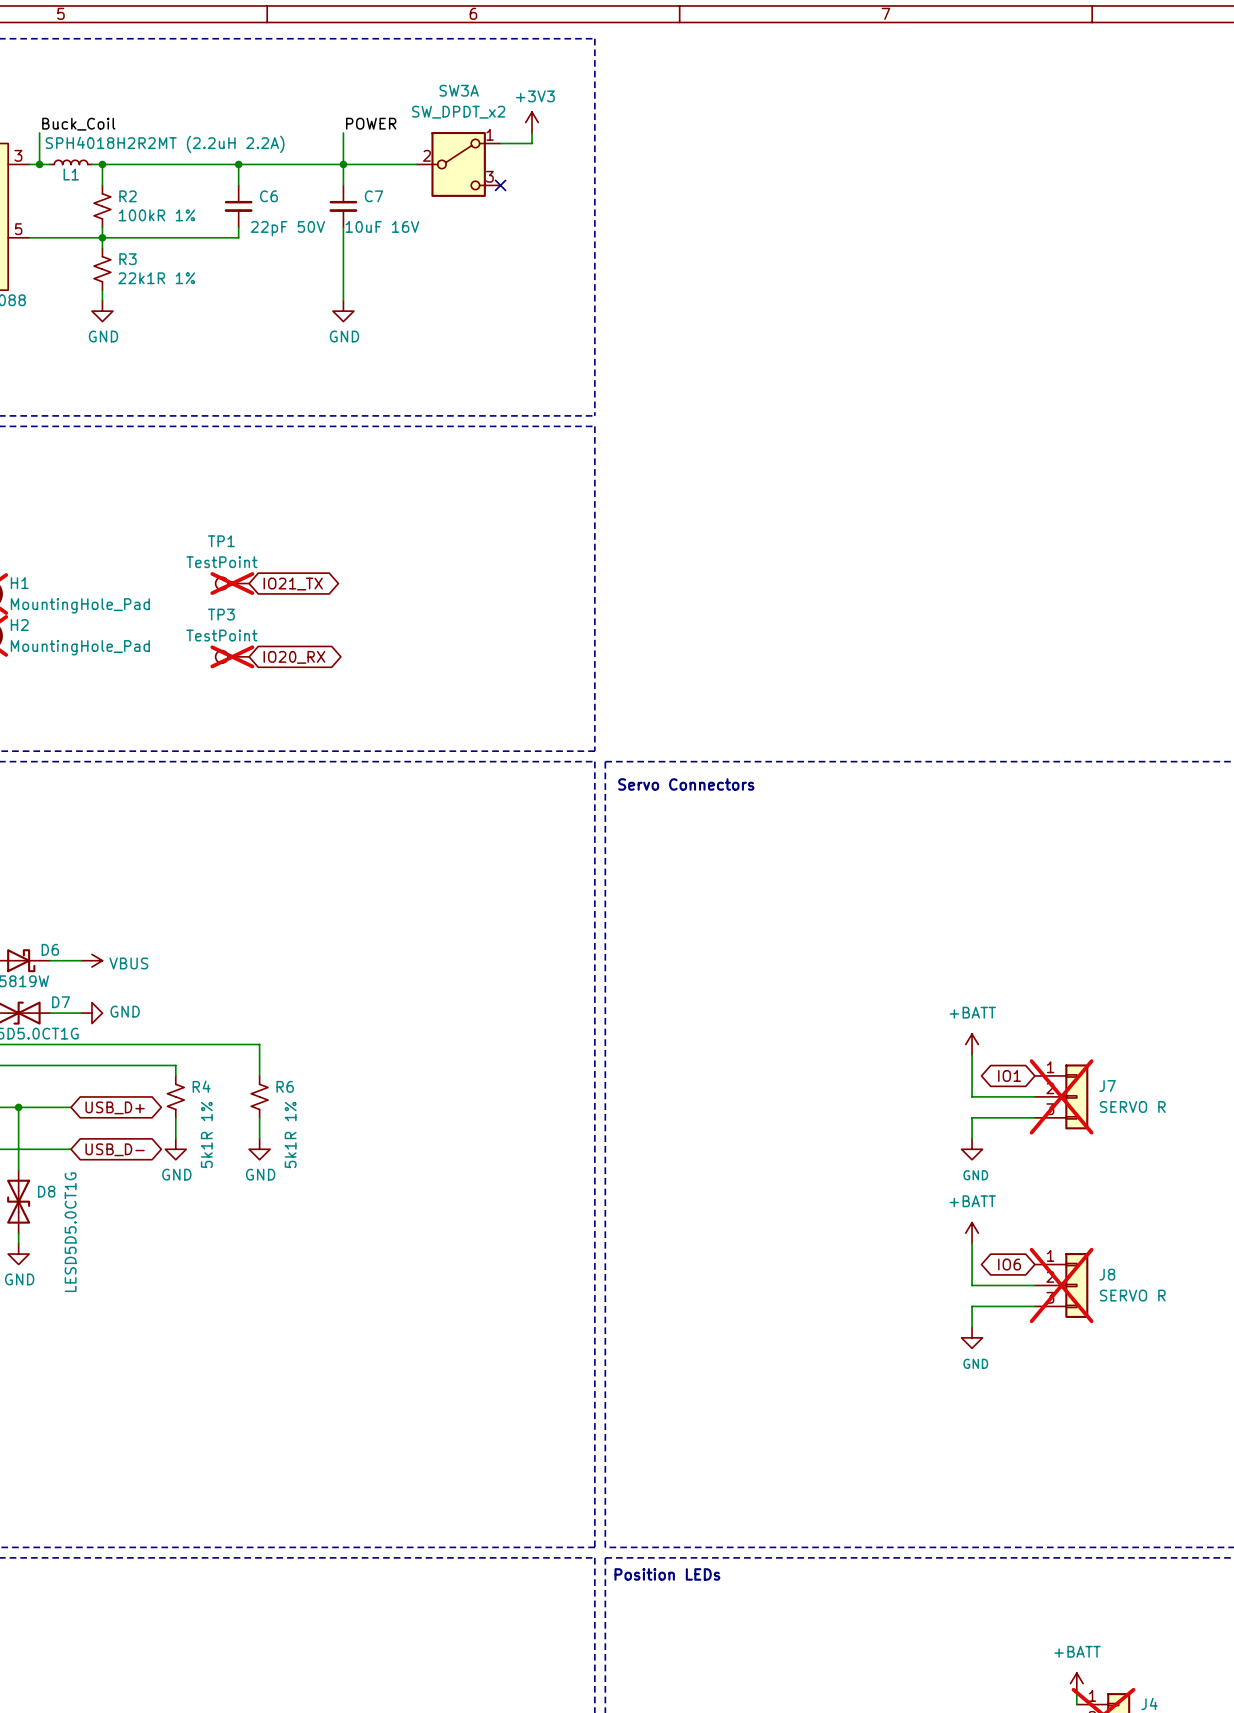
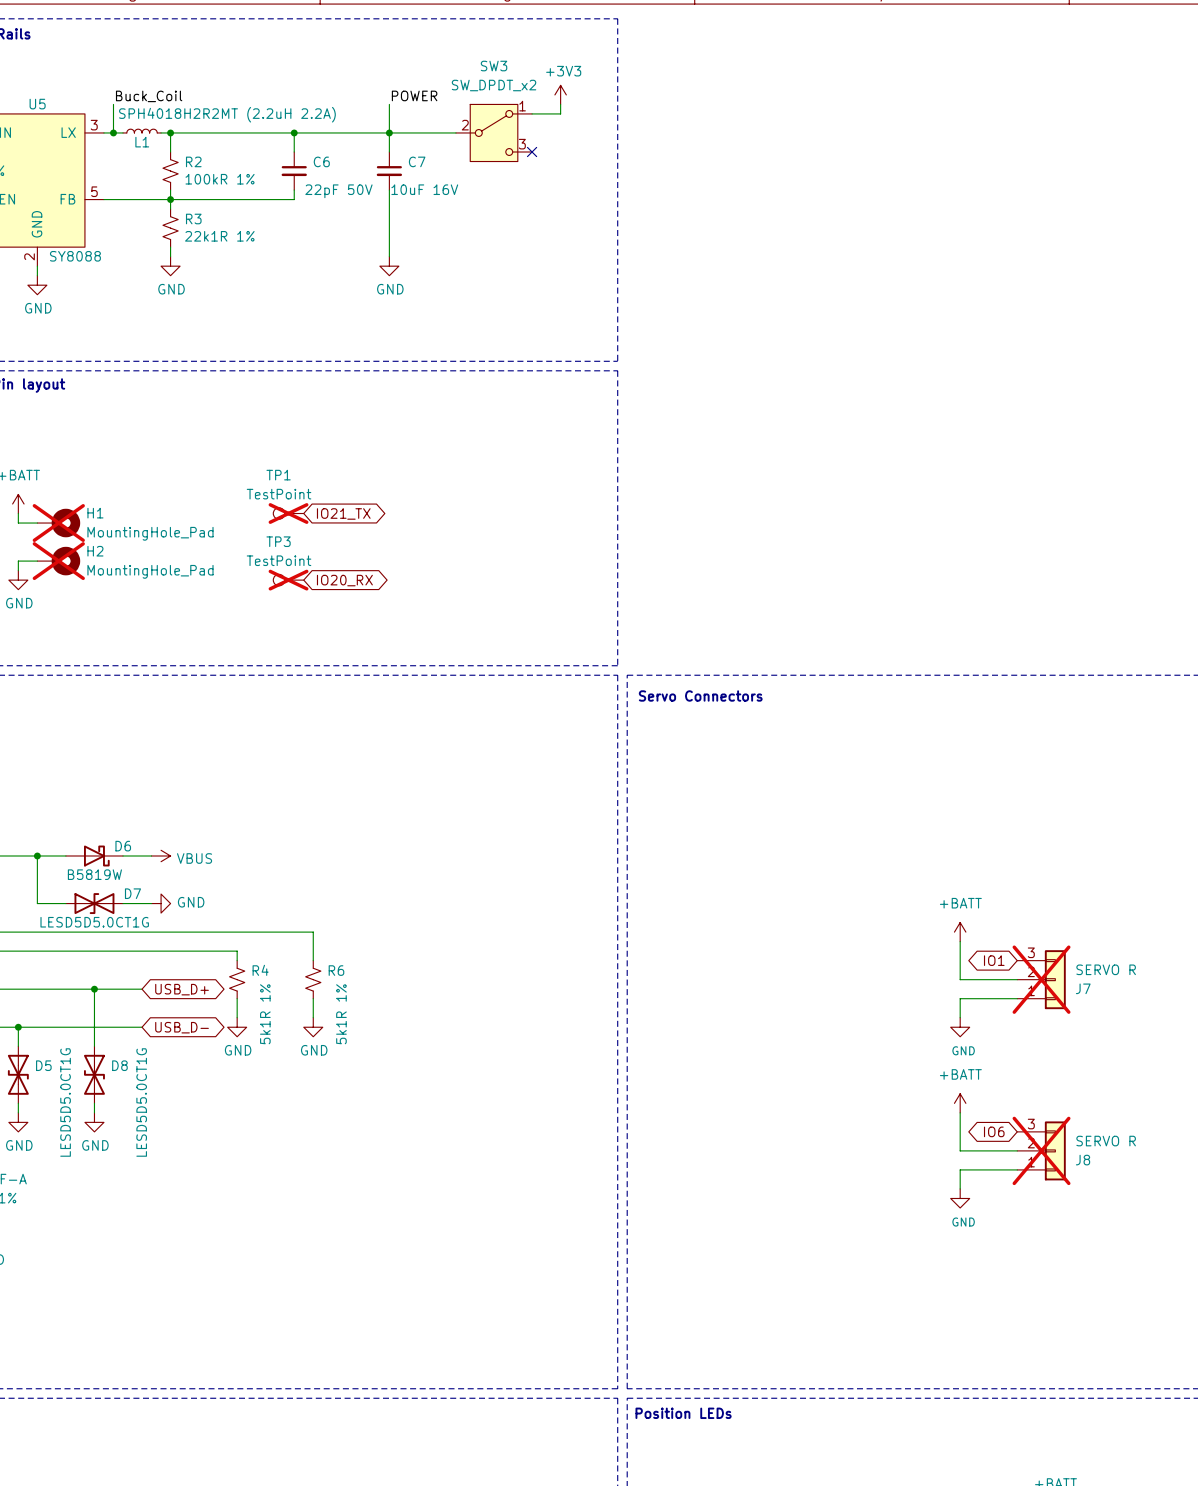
SW3A: SW_DPDT_x2 (458, 164) -> none
SW3: none -> SW_DPDT_x2 (494, 132)
J7 flip: as is (1076, 1096) -> up-down (1055, 979)
J8 flip: as is (1076, 1285) -> up-down (1055, 1150)

